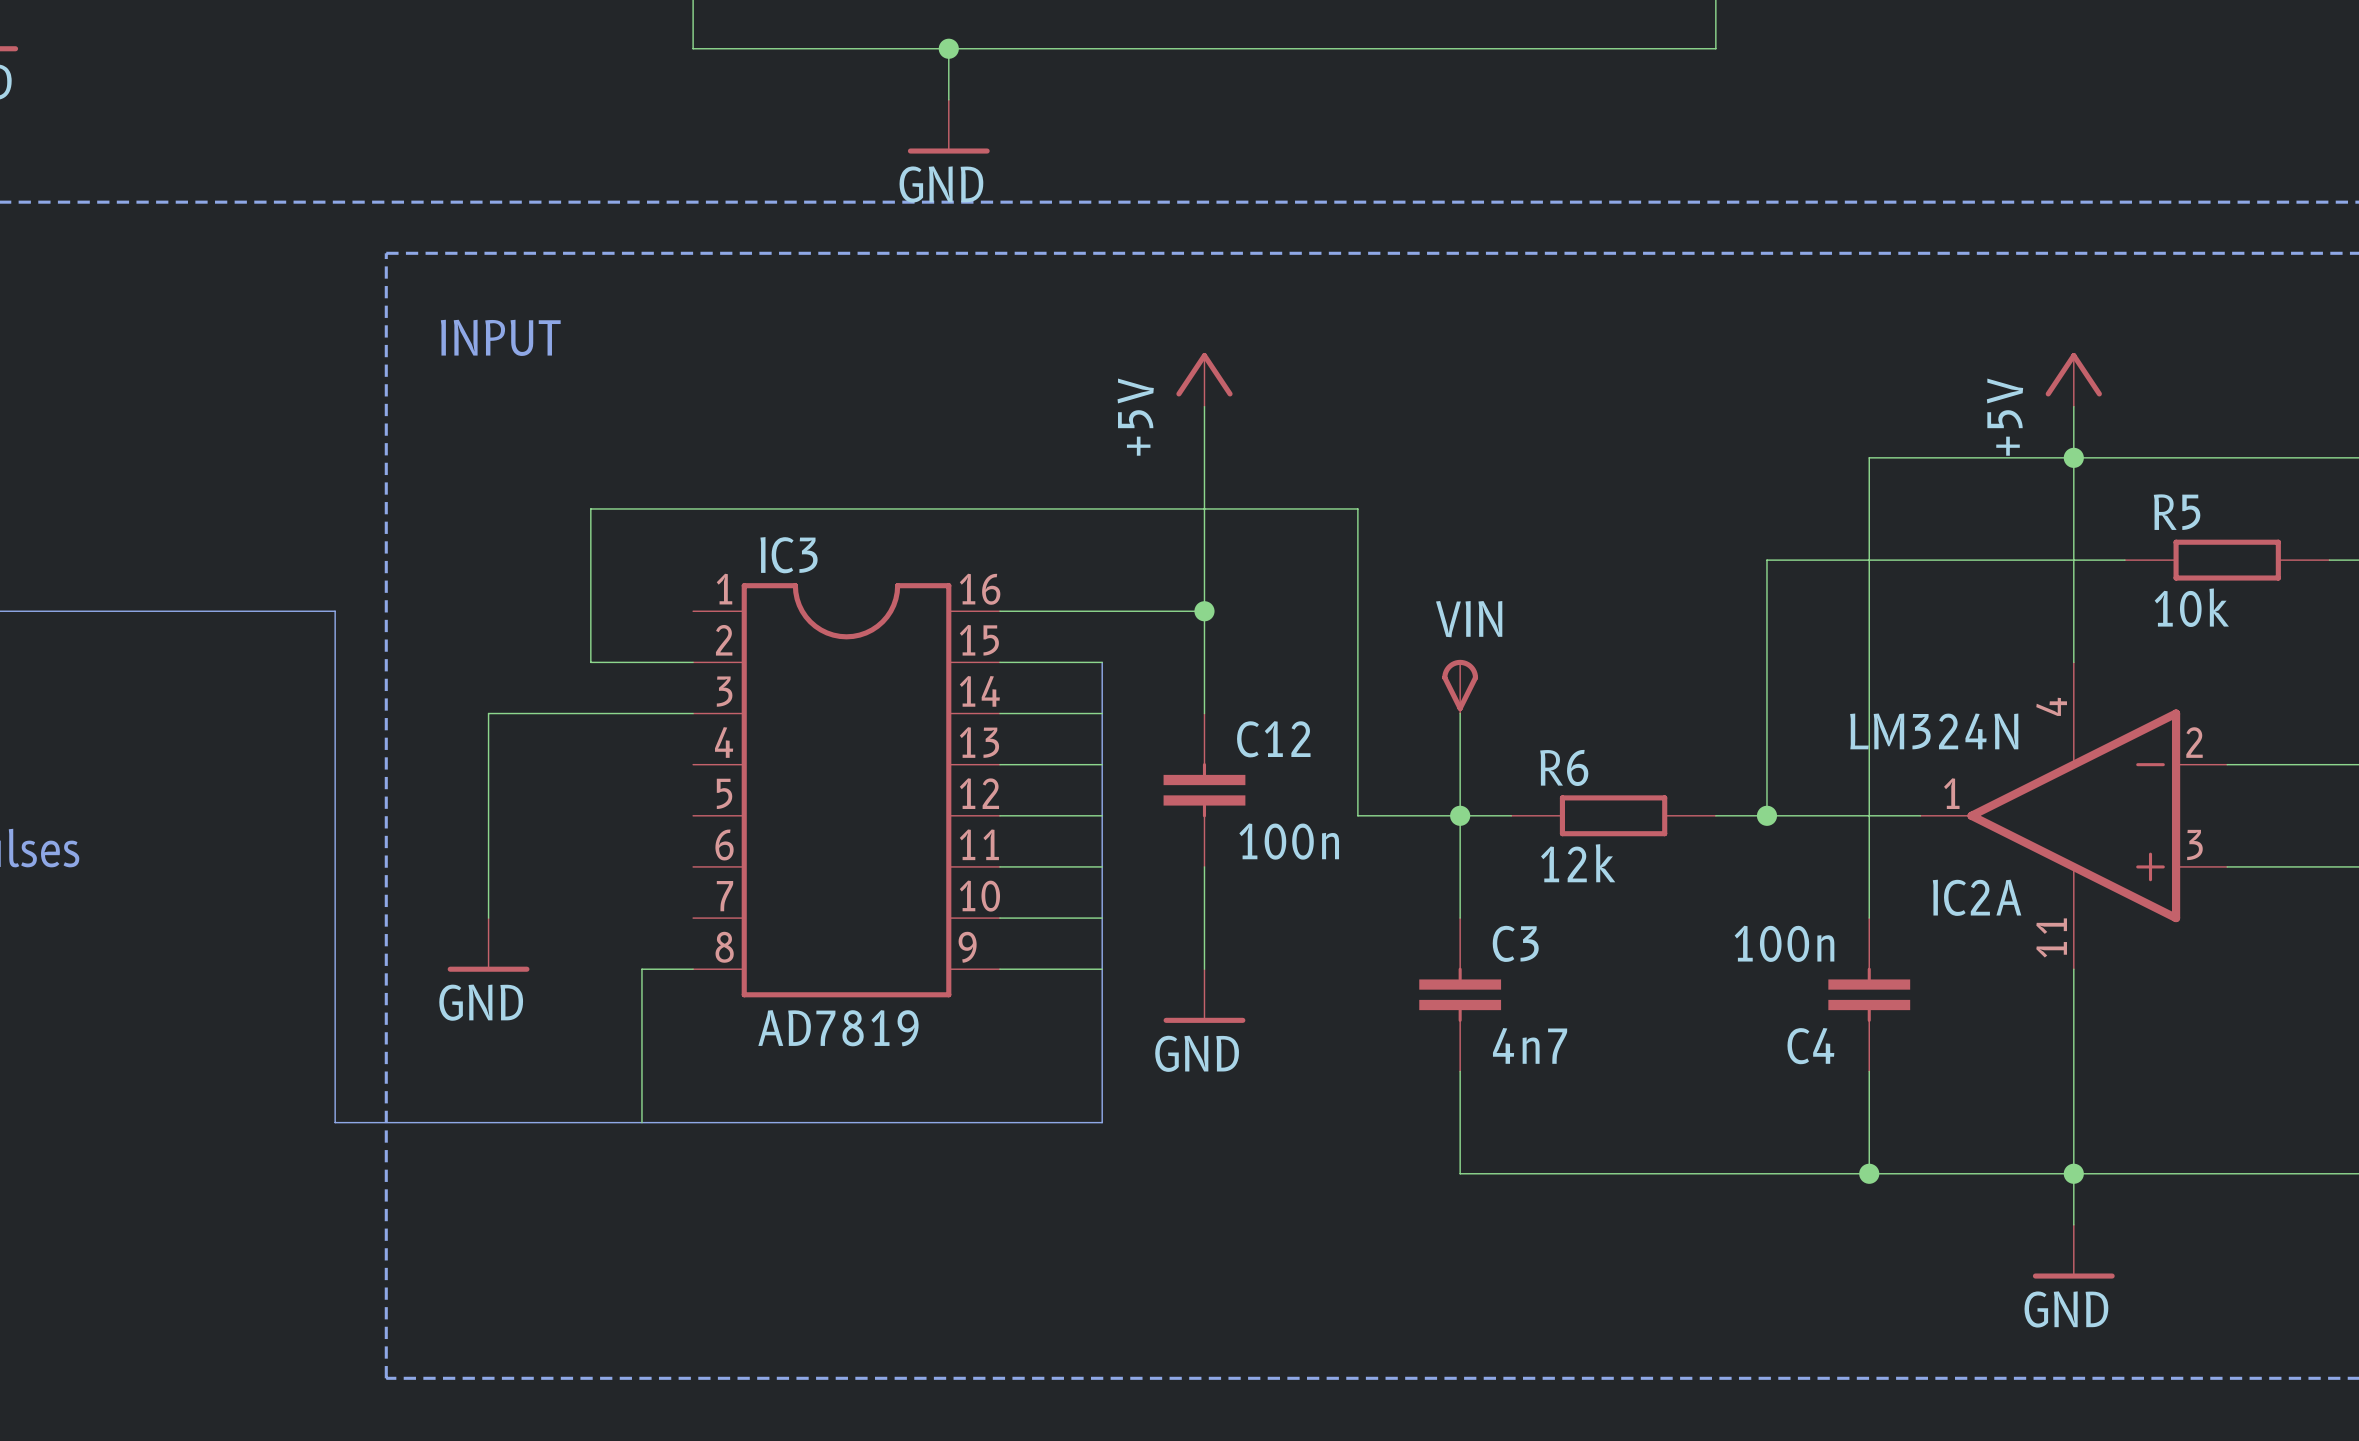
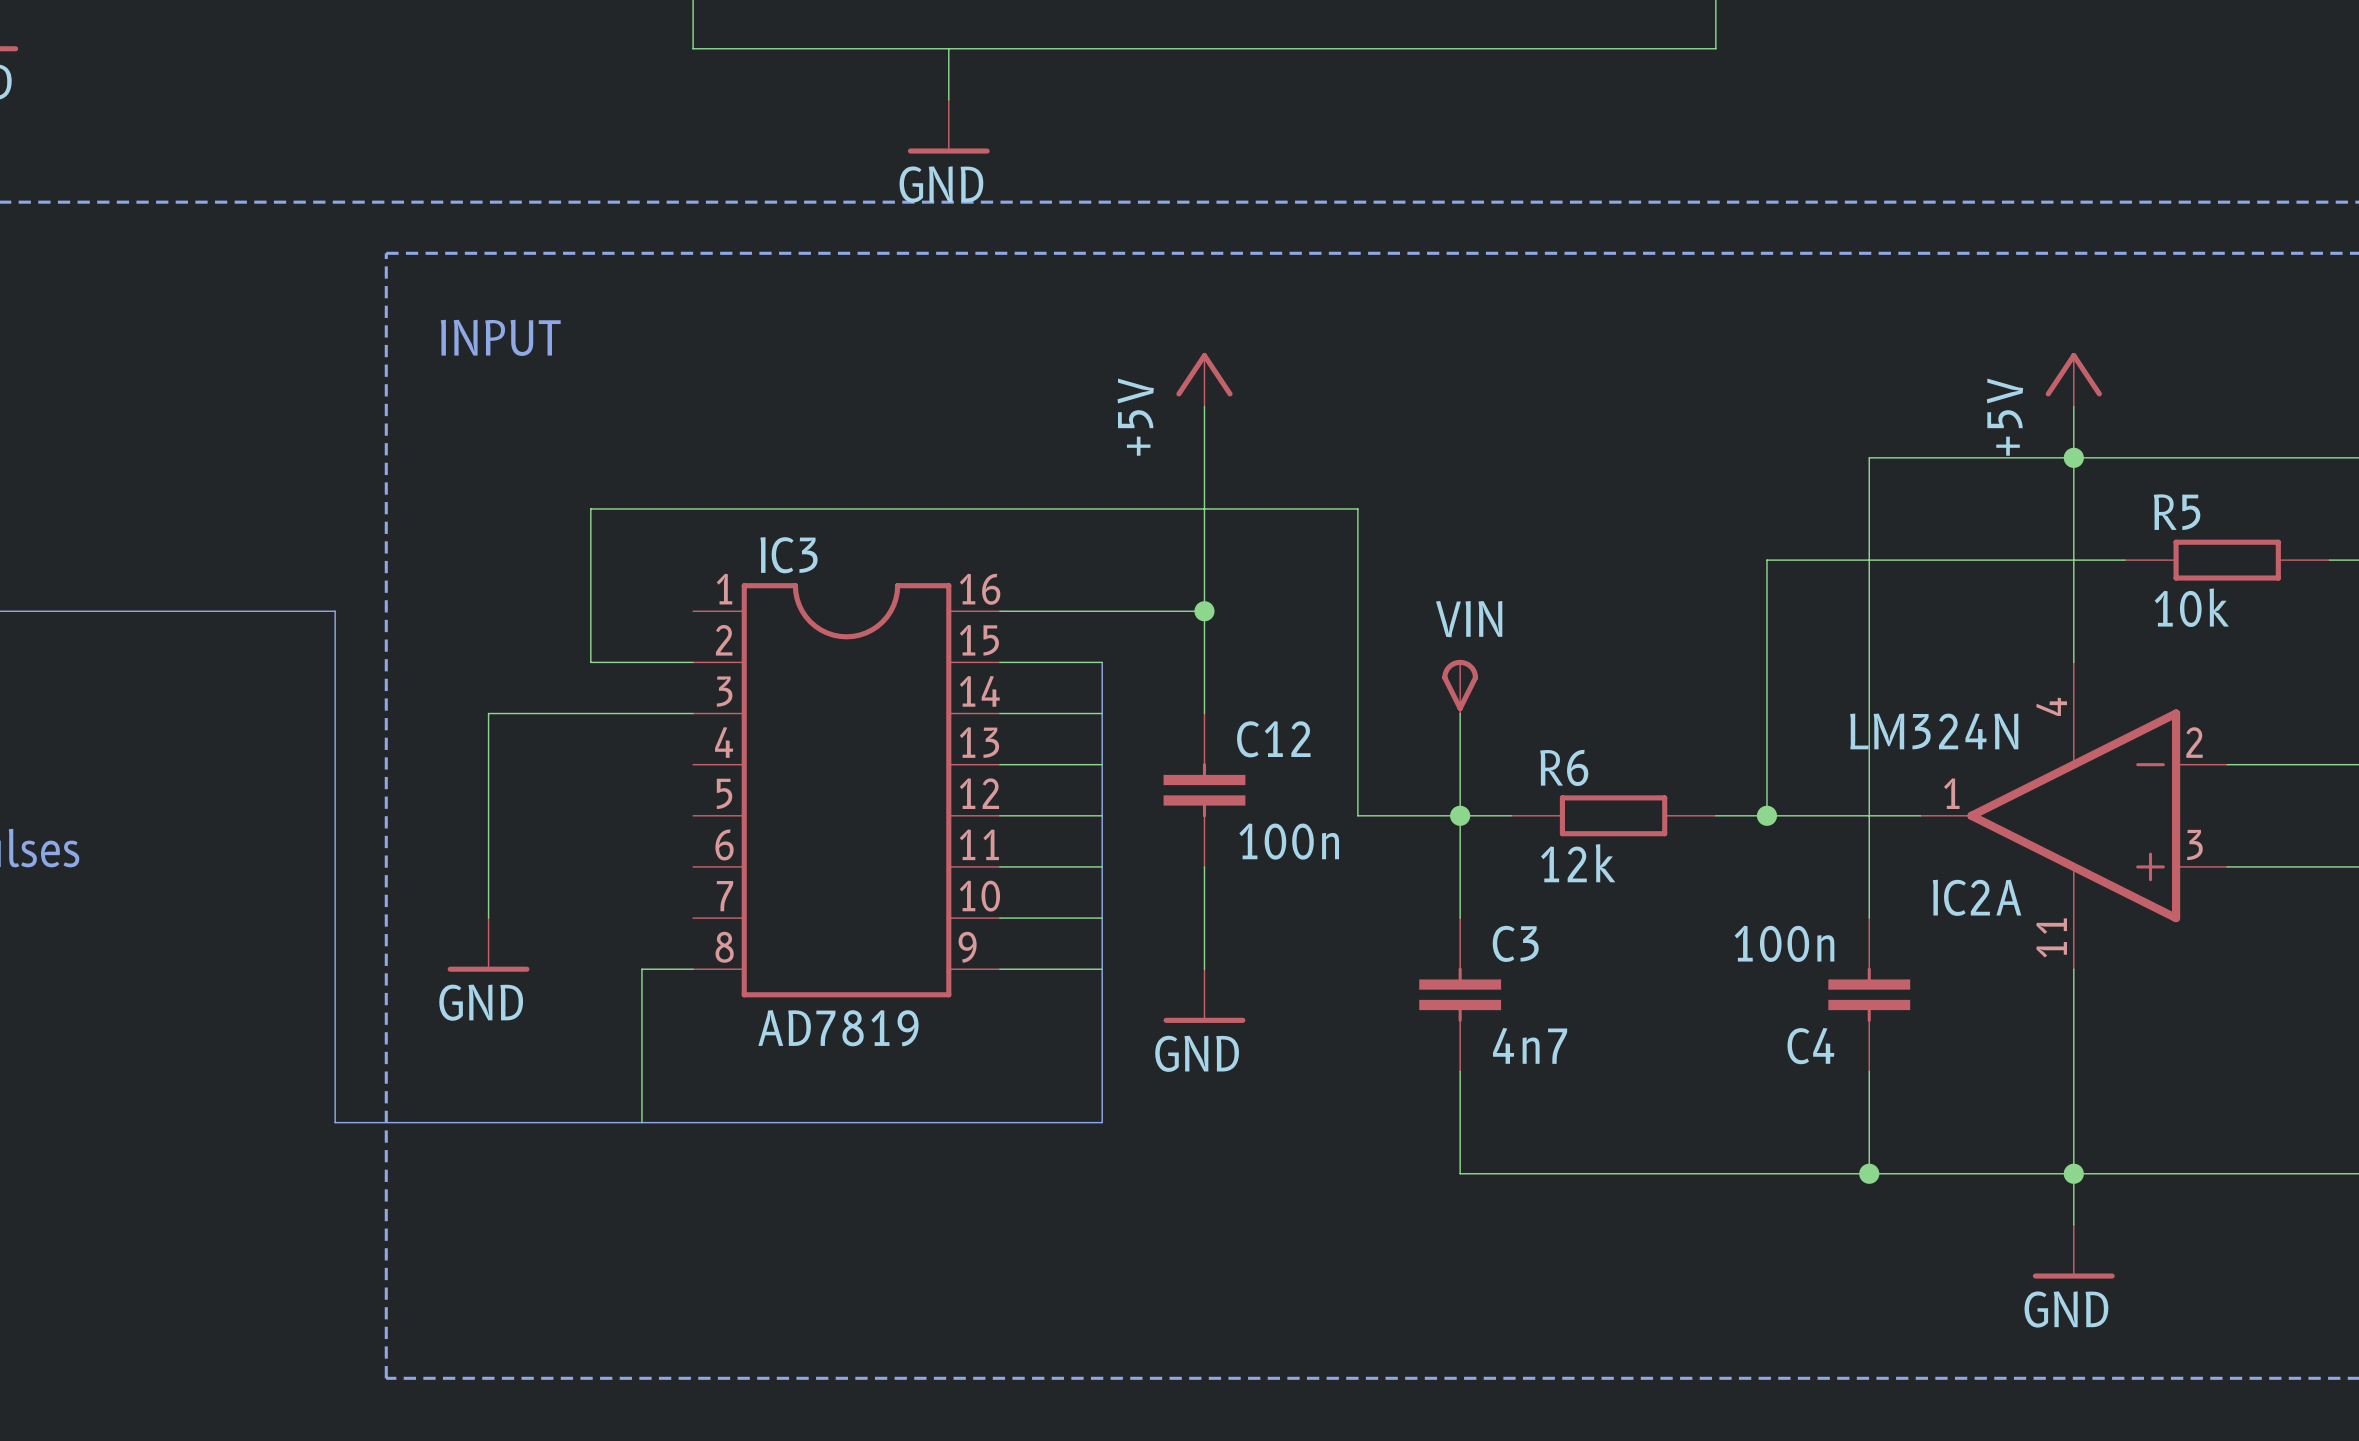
junction: (948, 48) -> none

